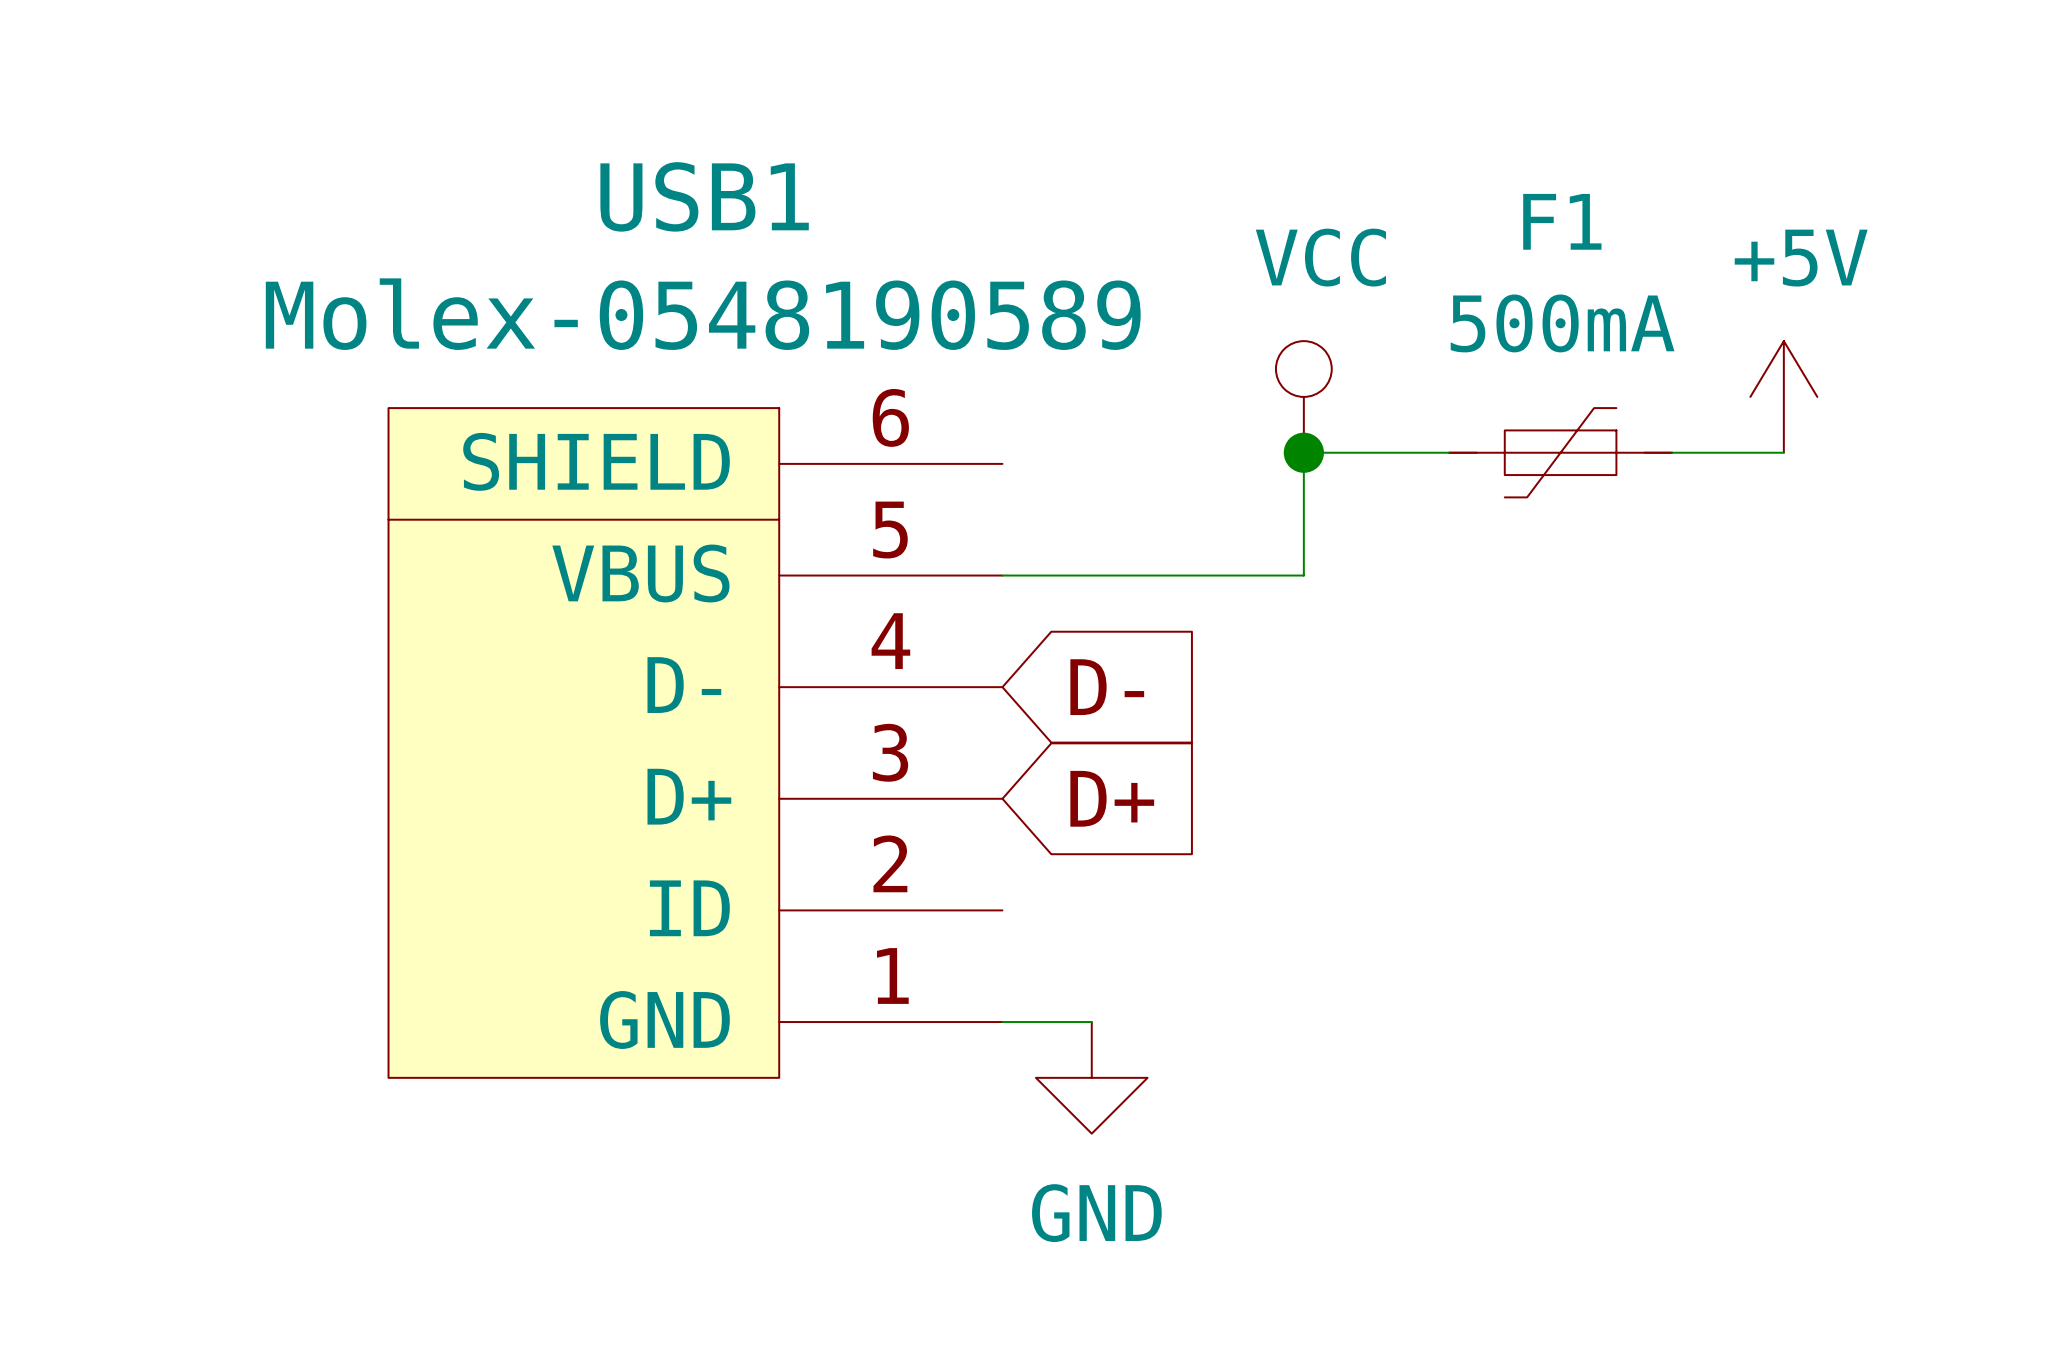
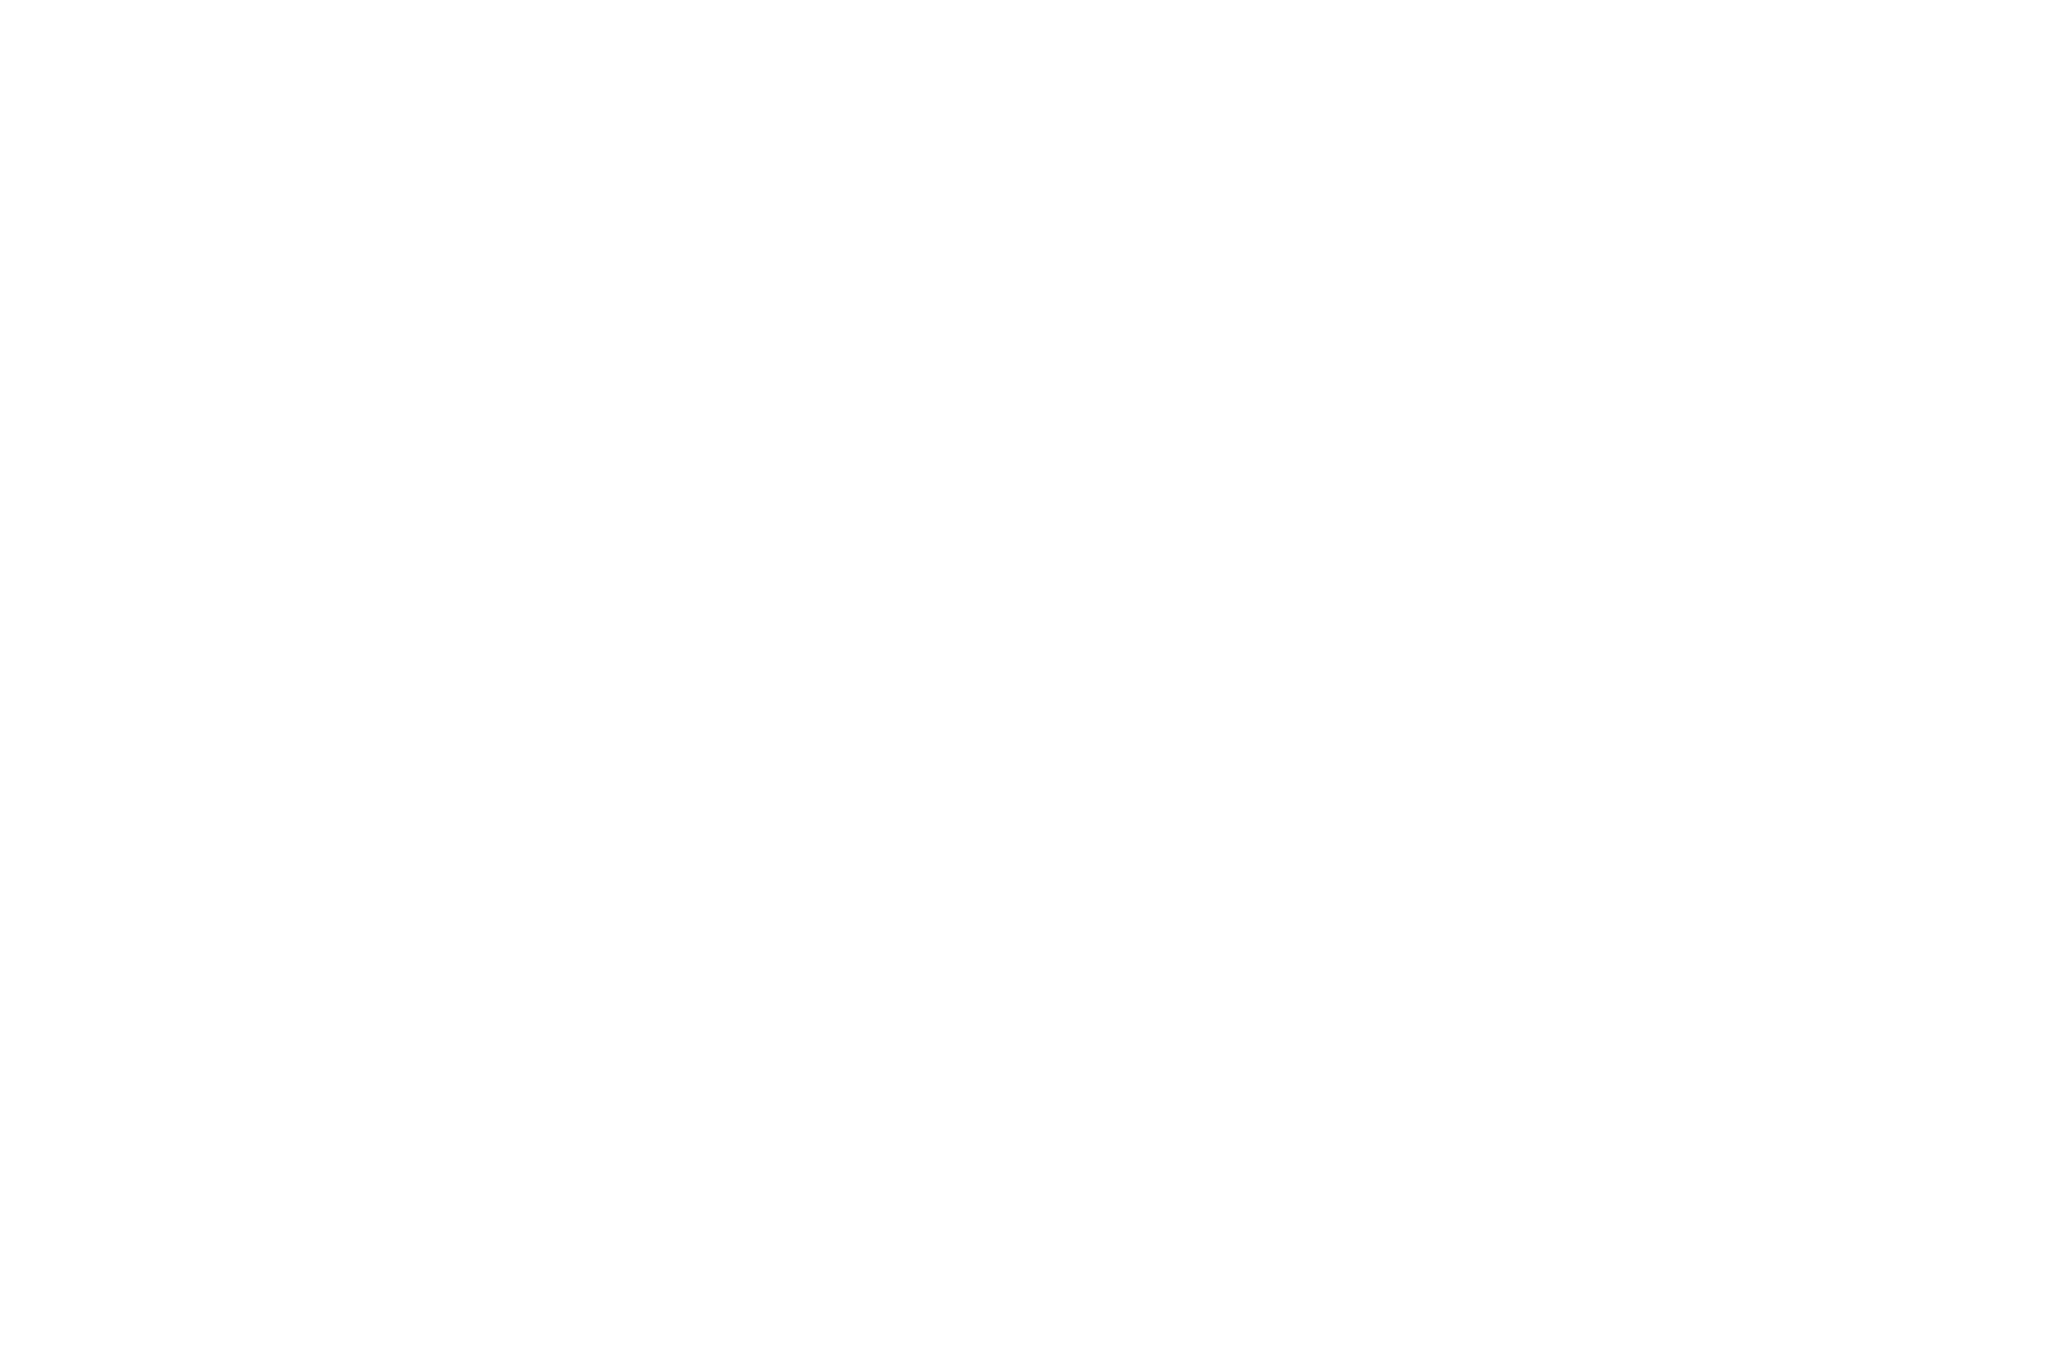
power symbol: VCC (1303, 396) -> none
power symbol: +5V (1783, 396) -> none
junction: (1303, 452) -> none
wire: (1448, 452) (1303, 452) (1303, 575) (1002, 575) -> none
F1: 500mA (1560, 452) -> none
wire: (1672, 452) (1783, 452) -> none
global label: D- (1107, 687) -> none
USB1: Molex-0548190589 (695, 742) -> none
global label: D+ (1112, 798) -> none
wire: (1002, 1022) (1091, 1022) -> none
power symbol: GND (1091, 1077) -> none

